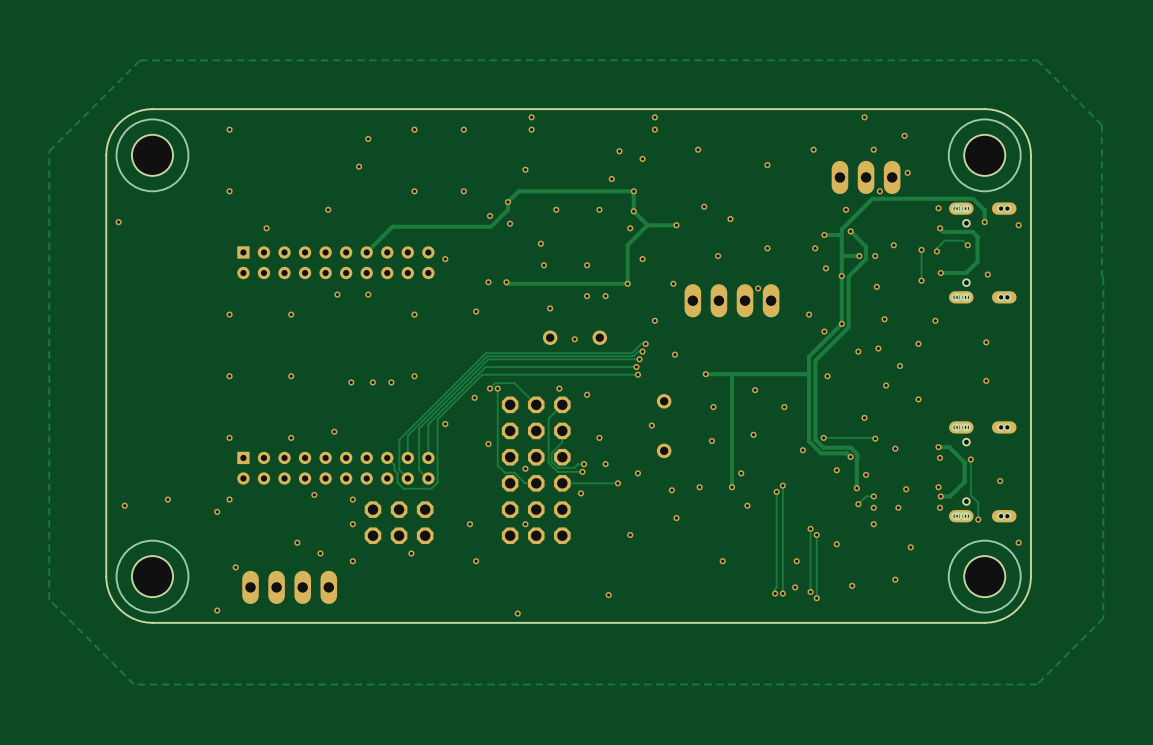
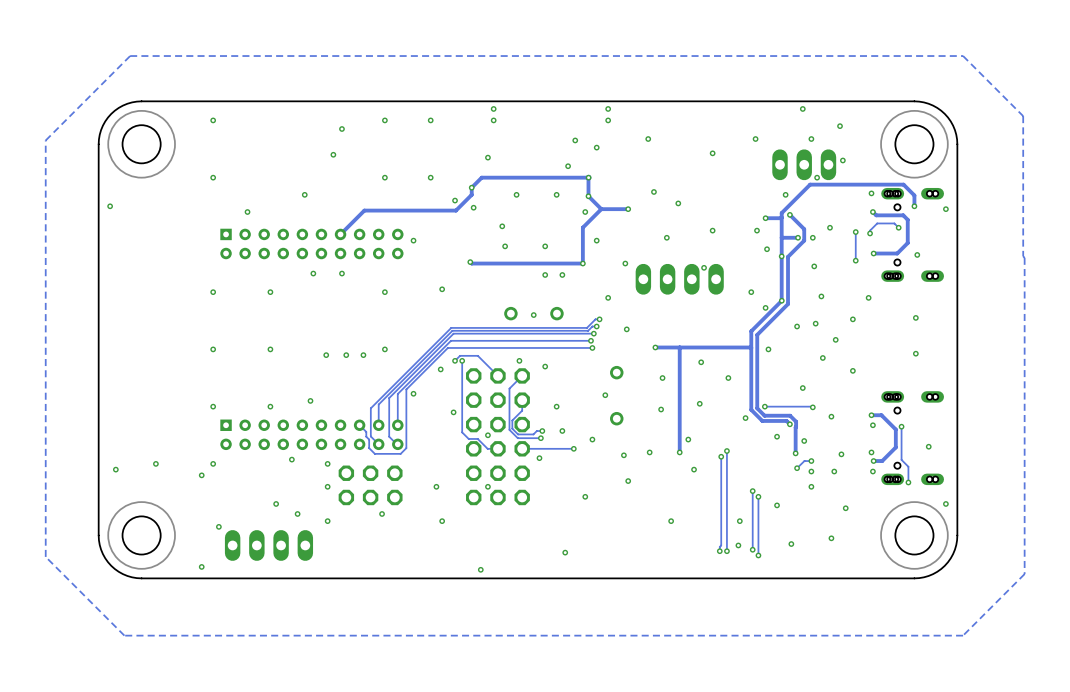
via: (488, 282) -> none
via: (550, 308) -> none

